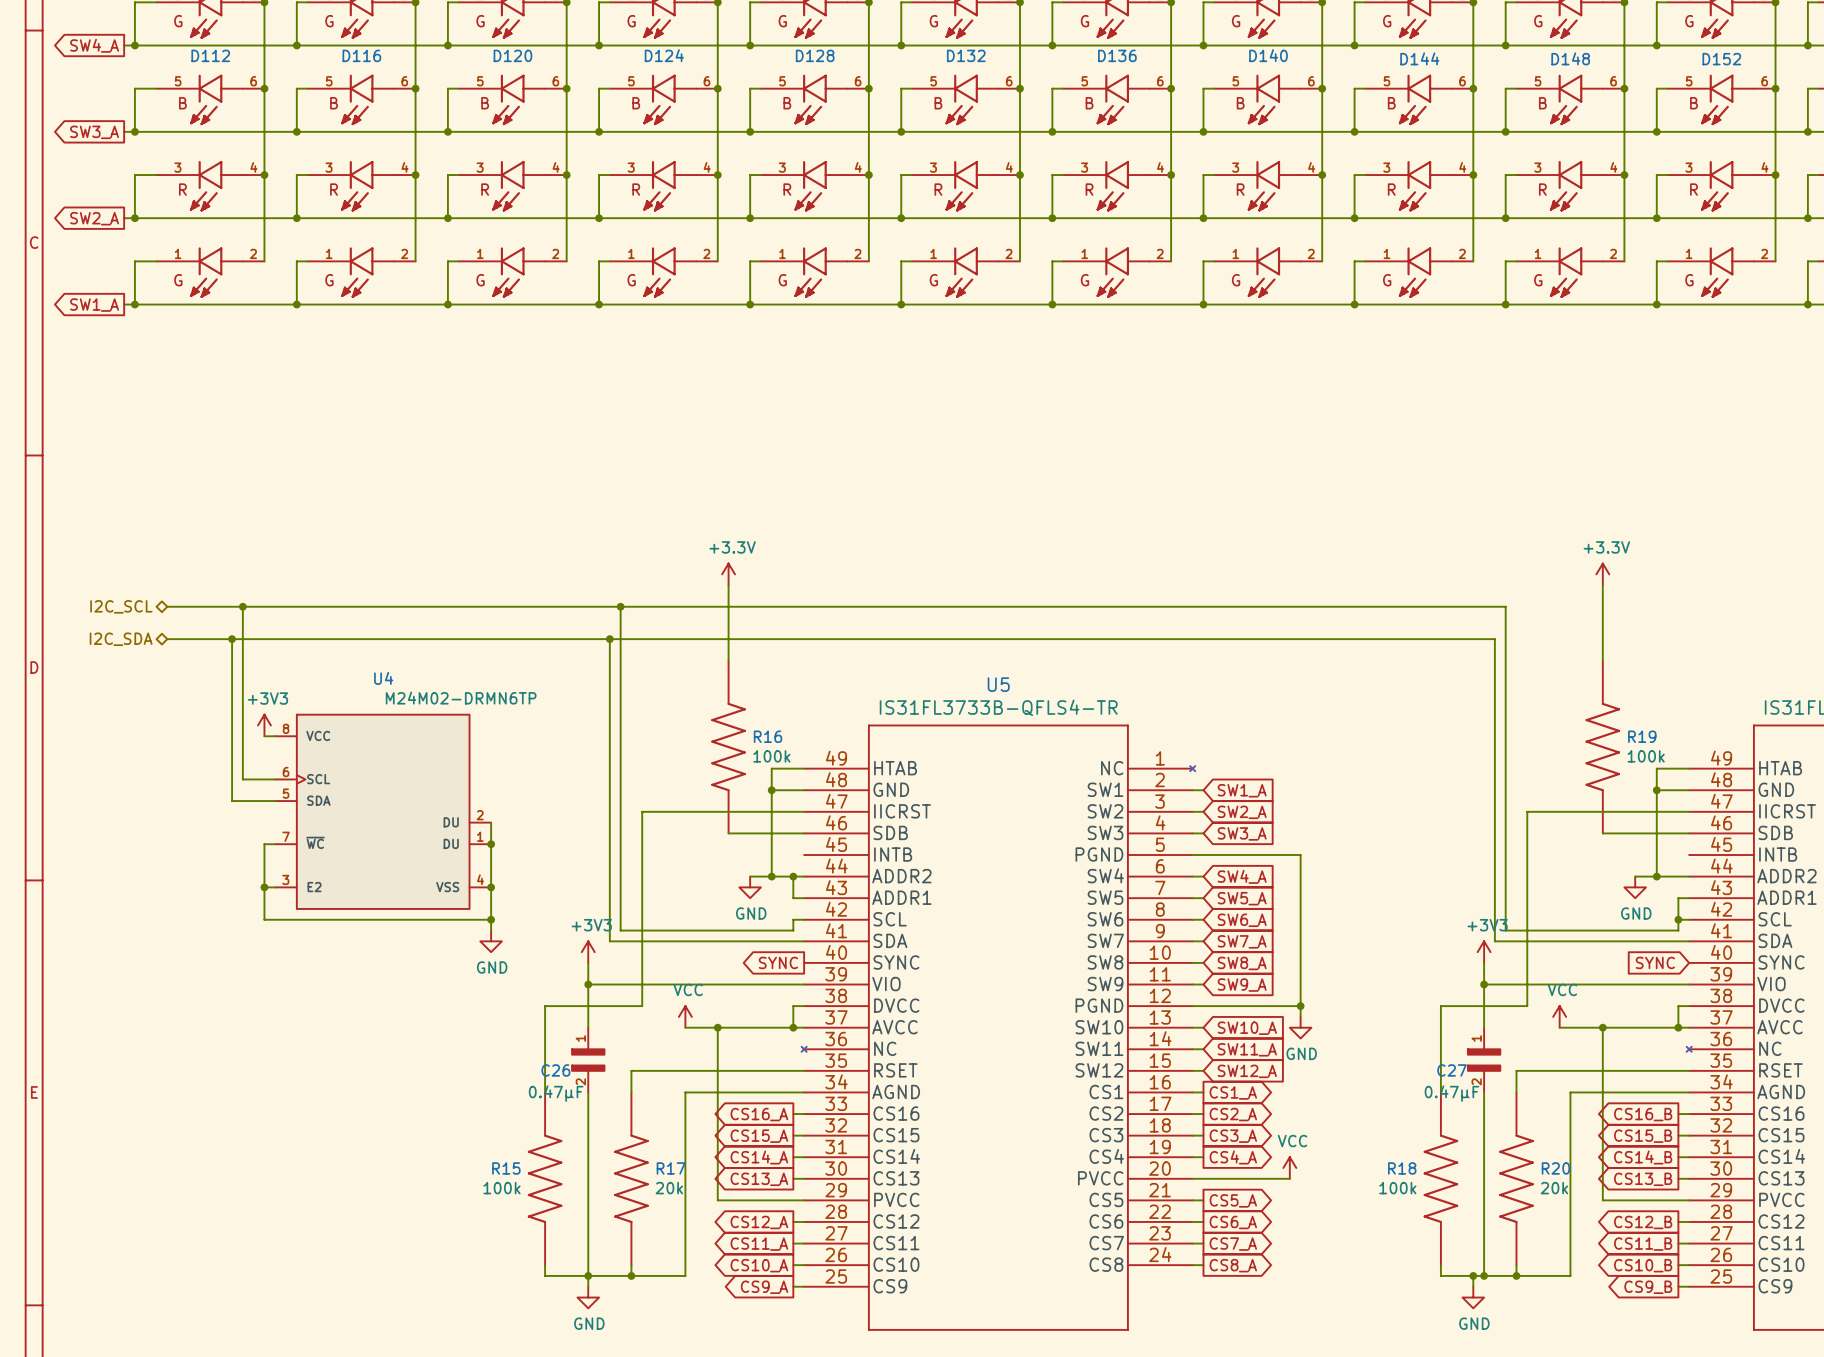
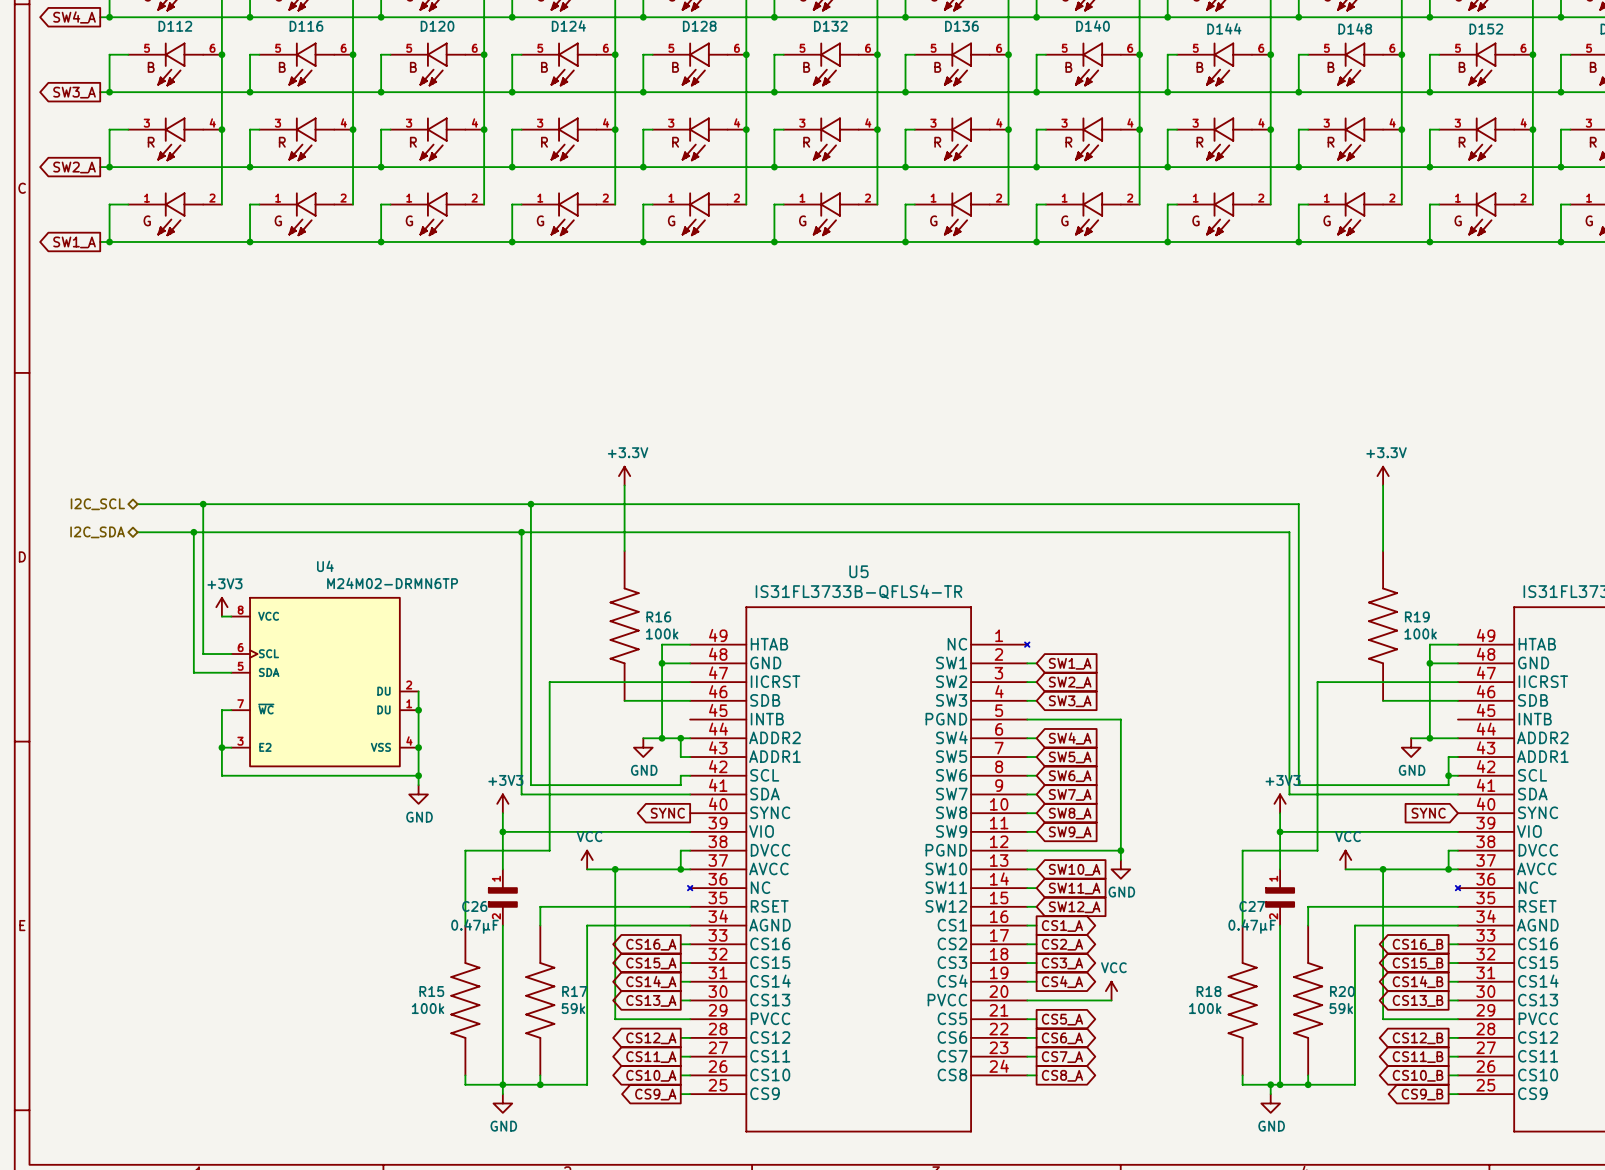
R17 text: 20k (669, 1188) -> 59k (573, 1008)
R20 text: 20k (1554, 1188) -> 59k (1341, 1008)

